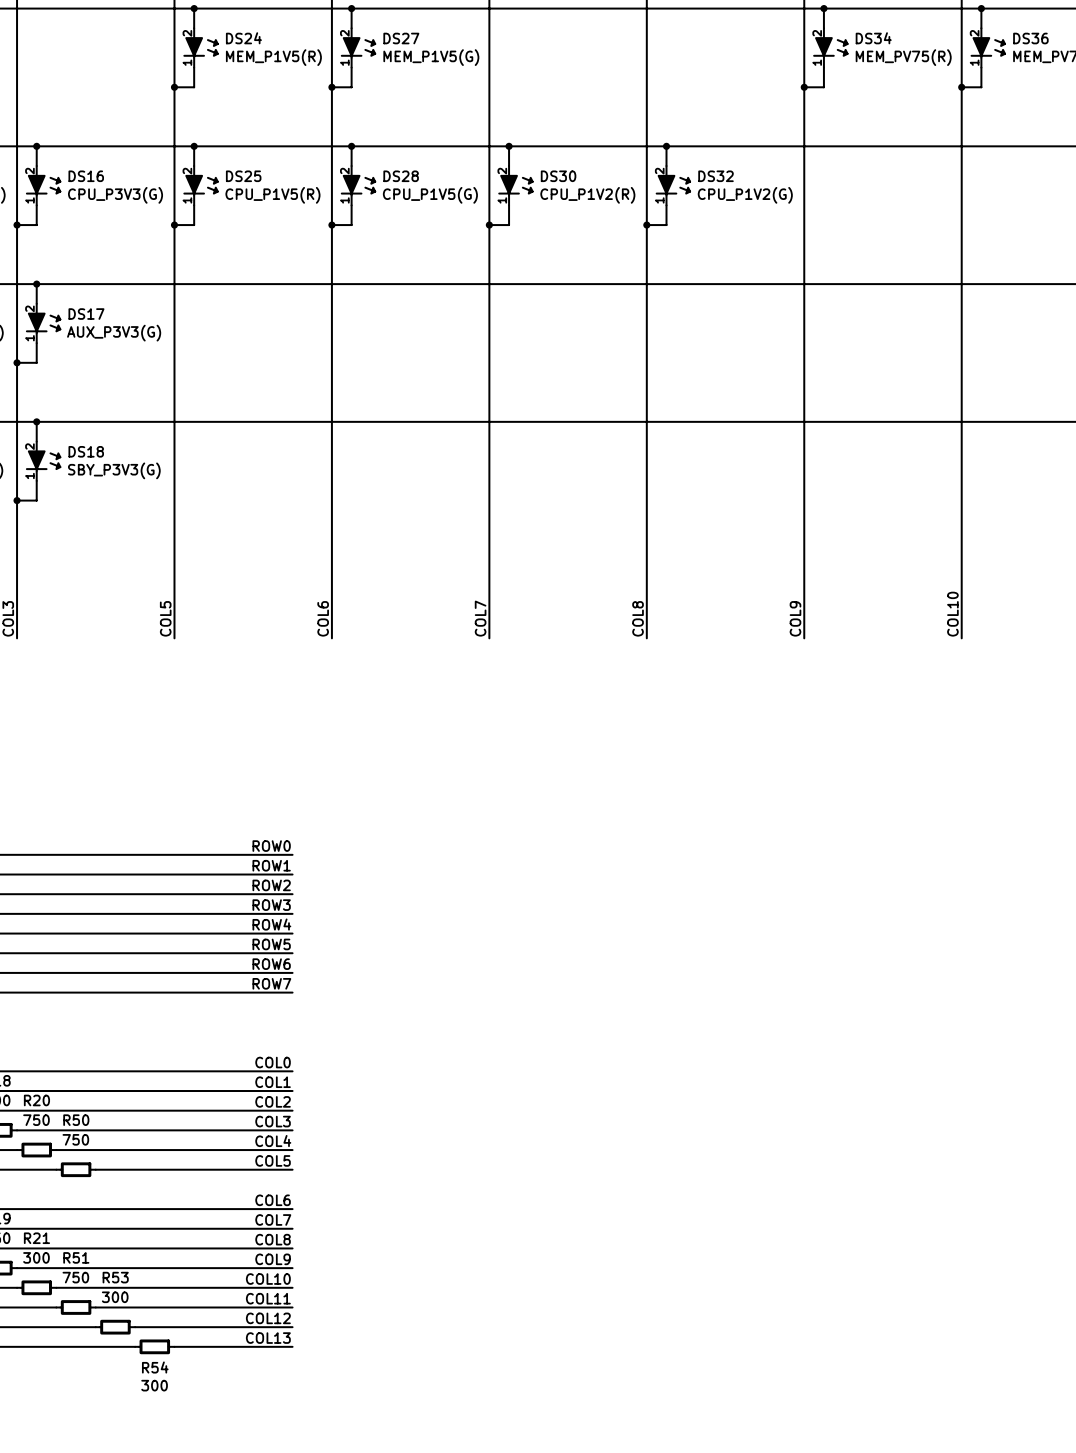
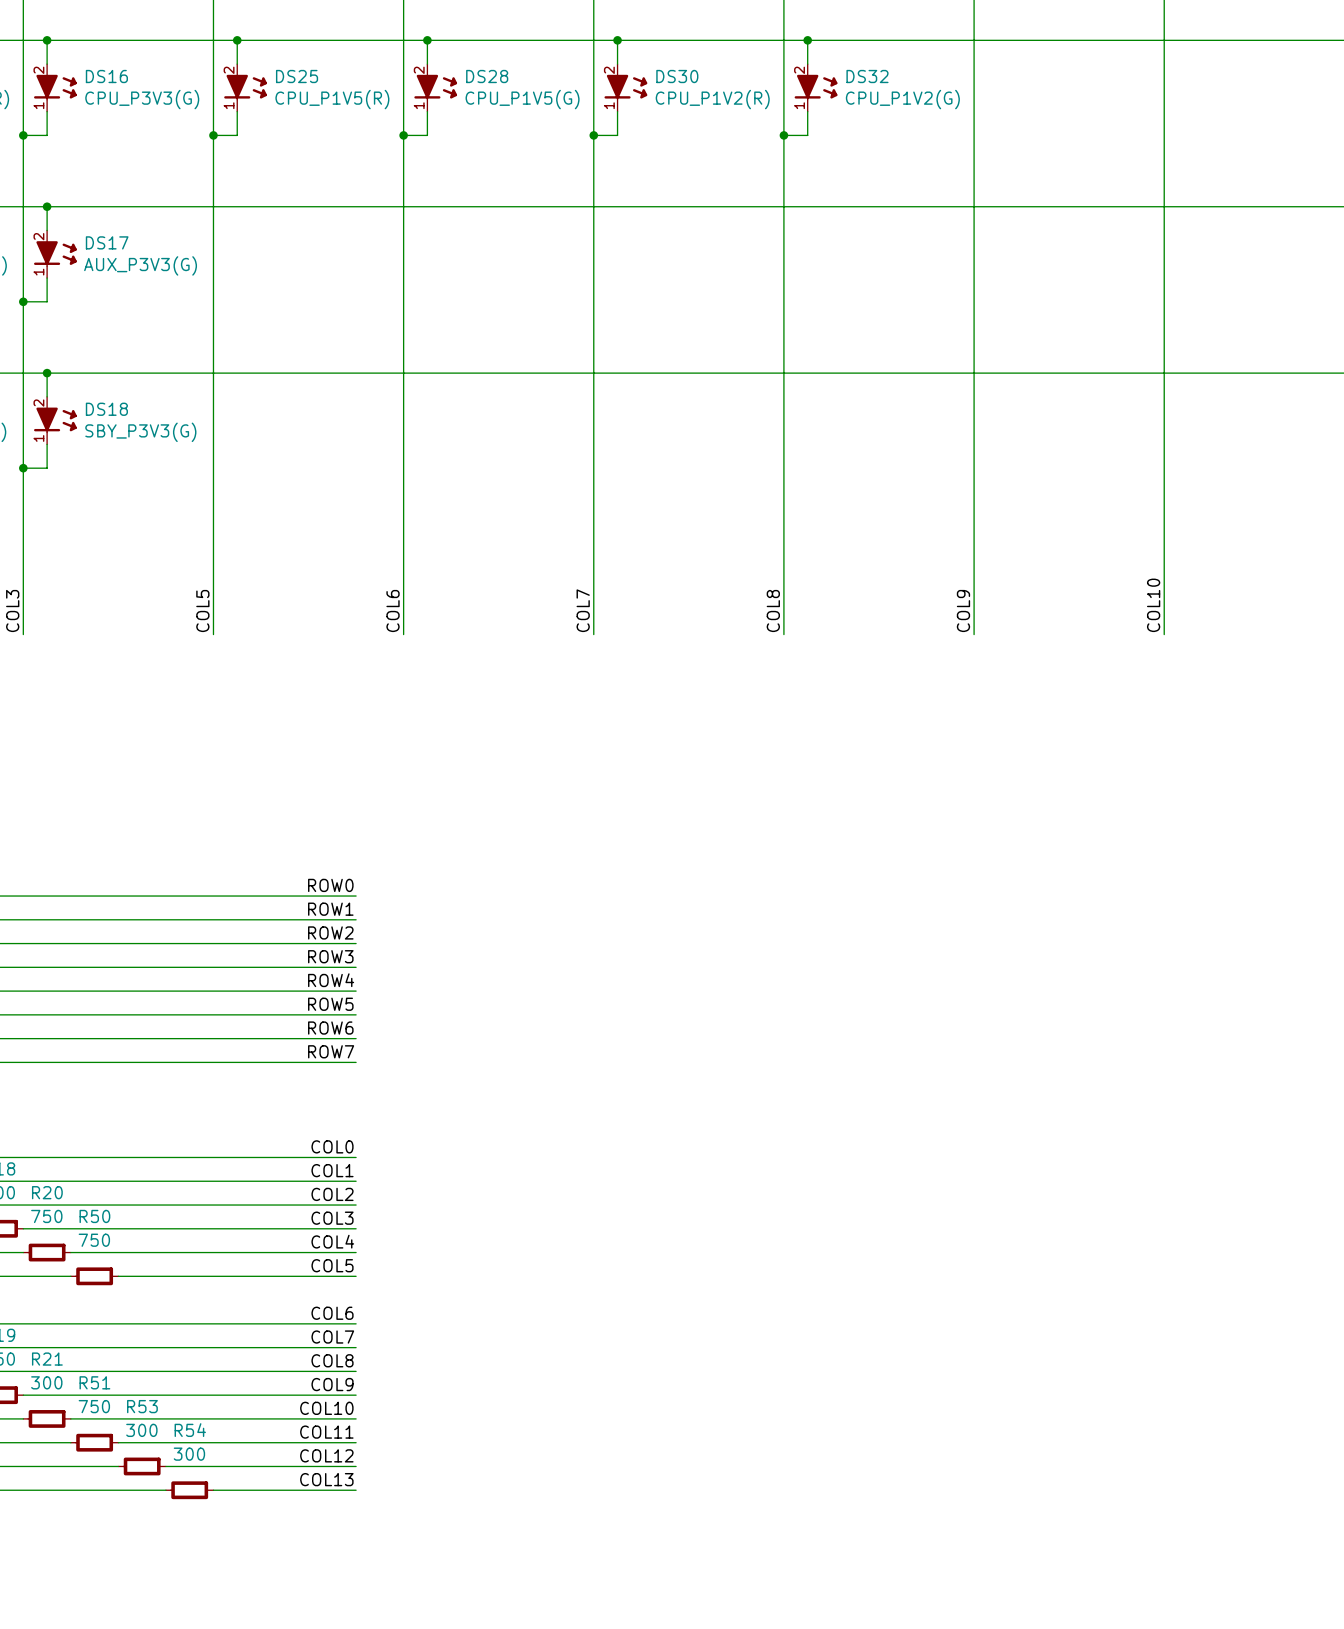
R54 name position: R54 (155, 1367) -> R54 (190, 1430)
R54 value position: 300 (154, 1385) -> 300 (189, 1454)

